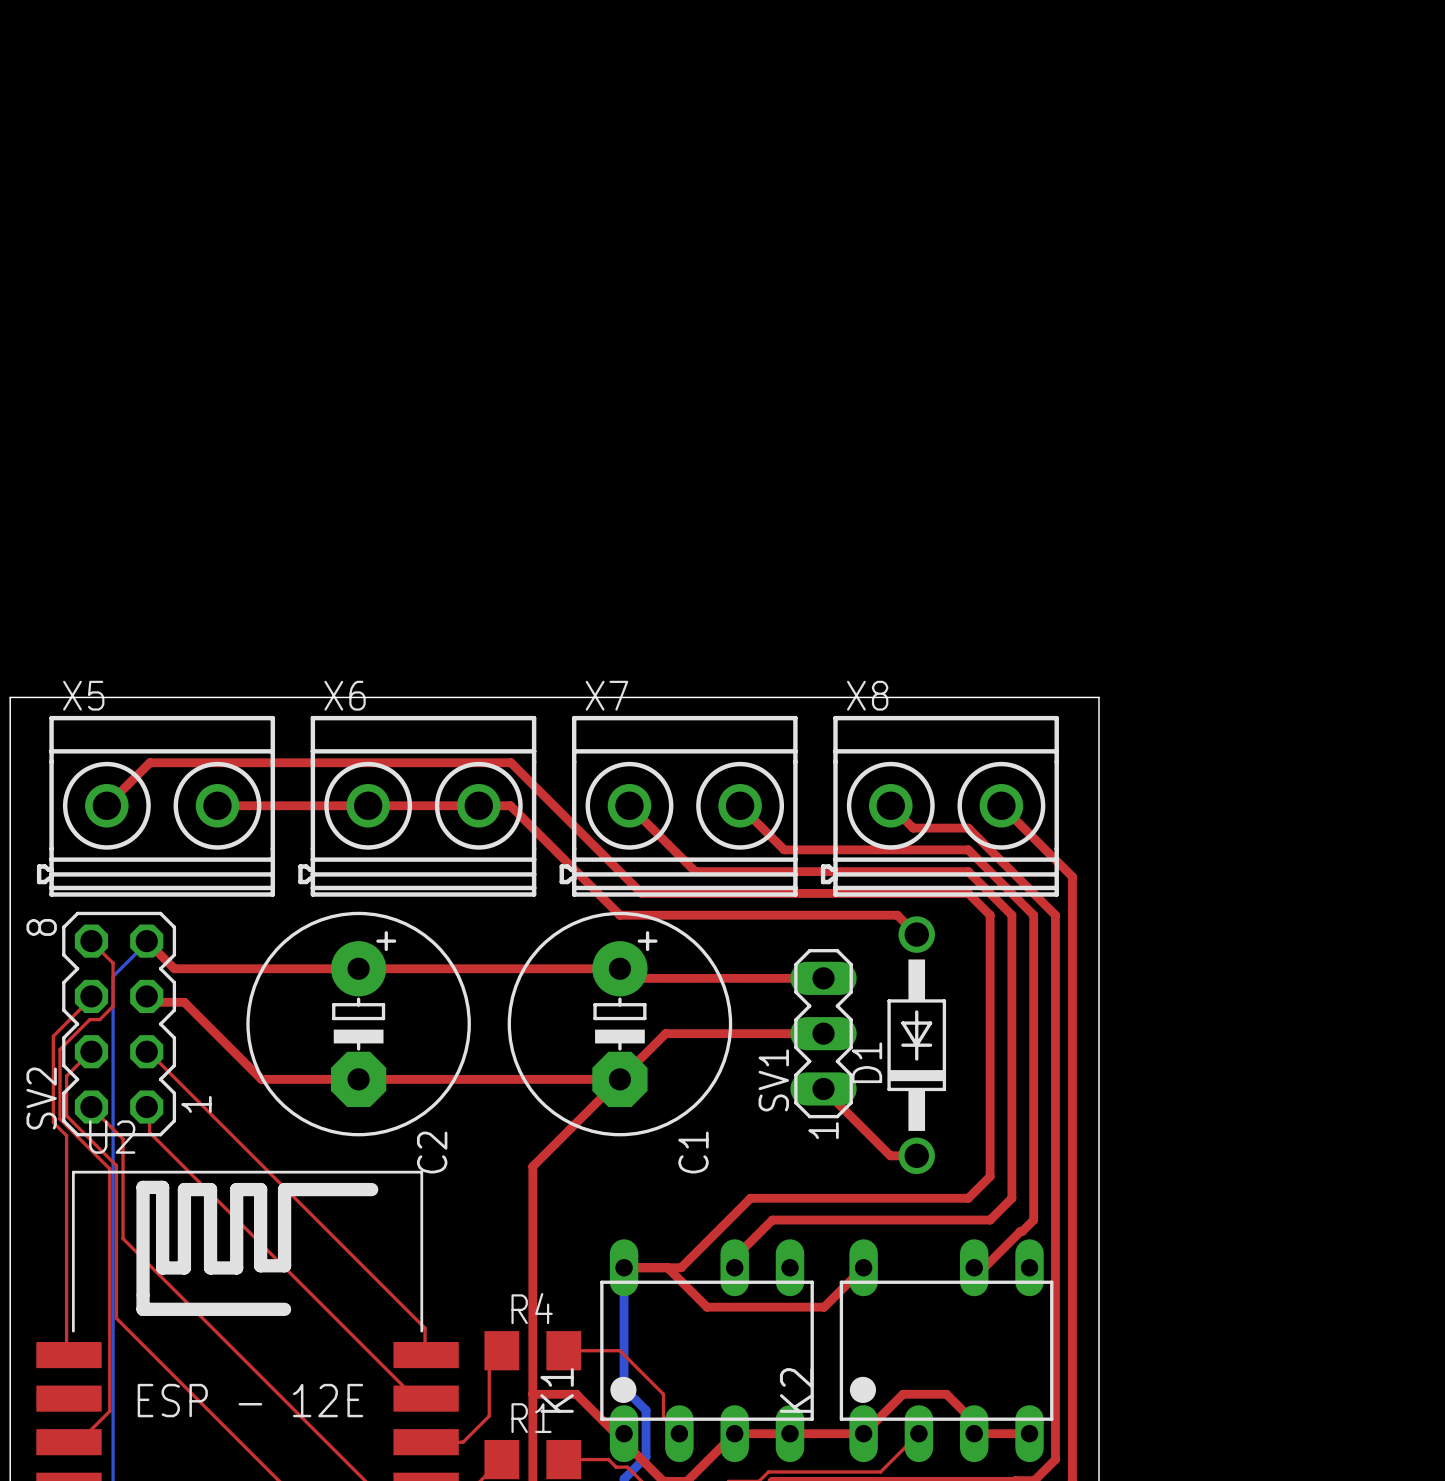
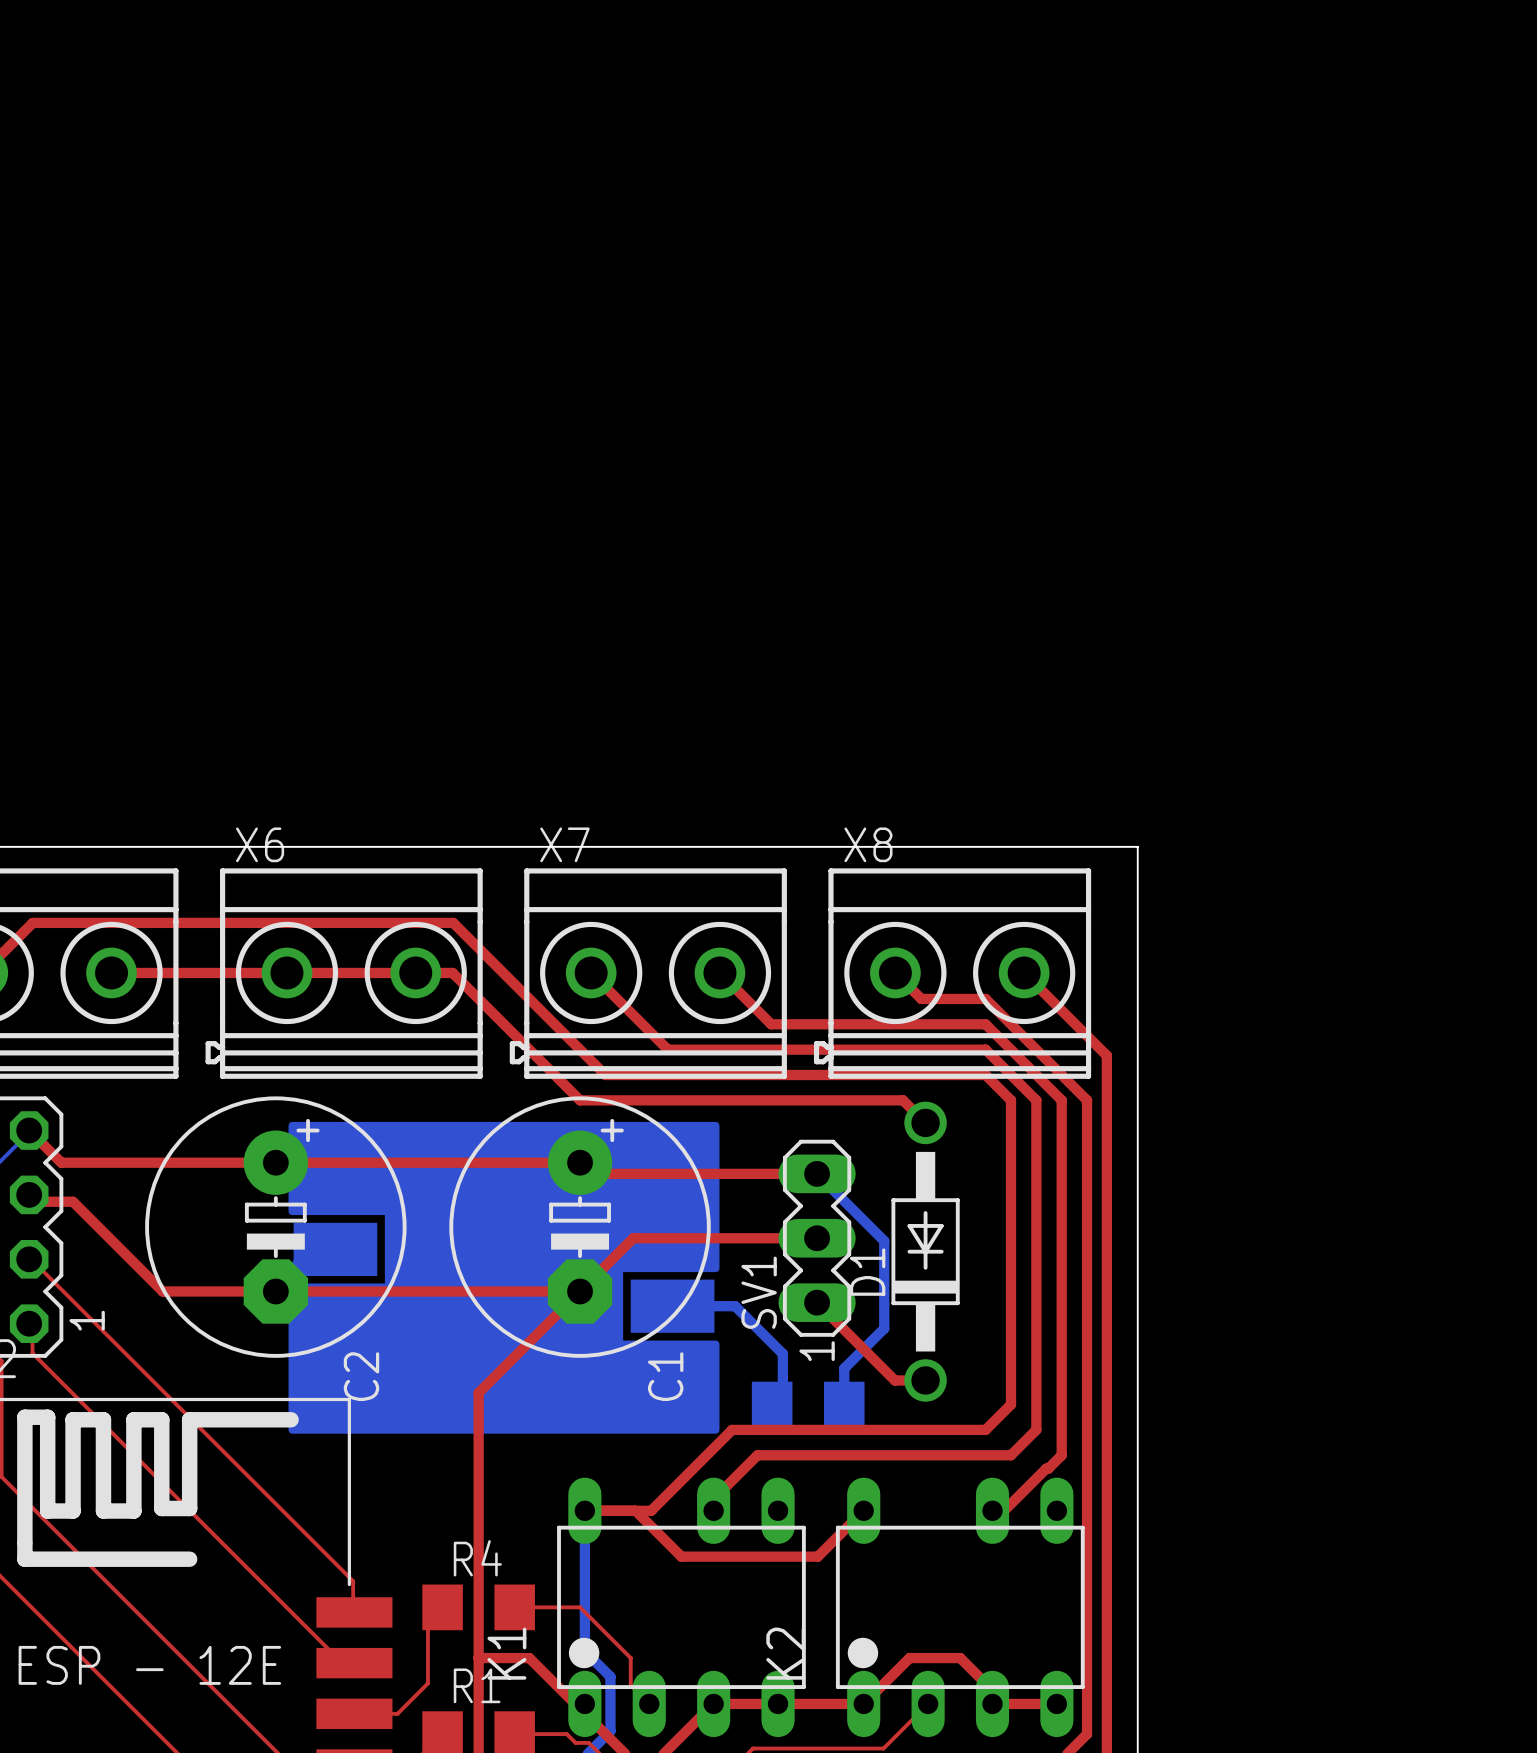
bottom track: none -> (817, 1173) (884, 1241) (884, 1328) (844, 1368) (844, 1404)
part: none -> (504, 1277)
bottom track: none -> (672, 1306) (735, 1306) (782, 1353) (782, 1393) (772, 1404)
part: none -> (808, 1404)

